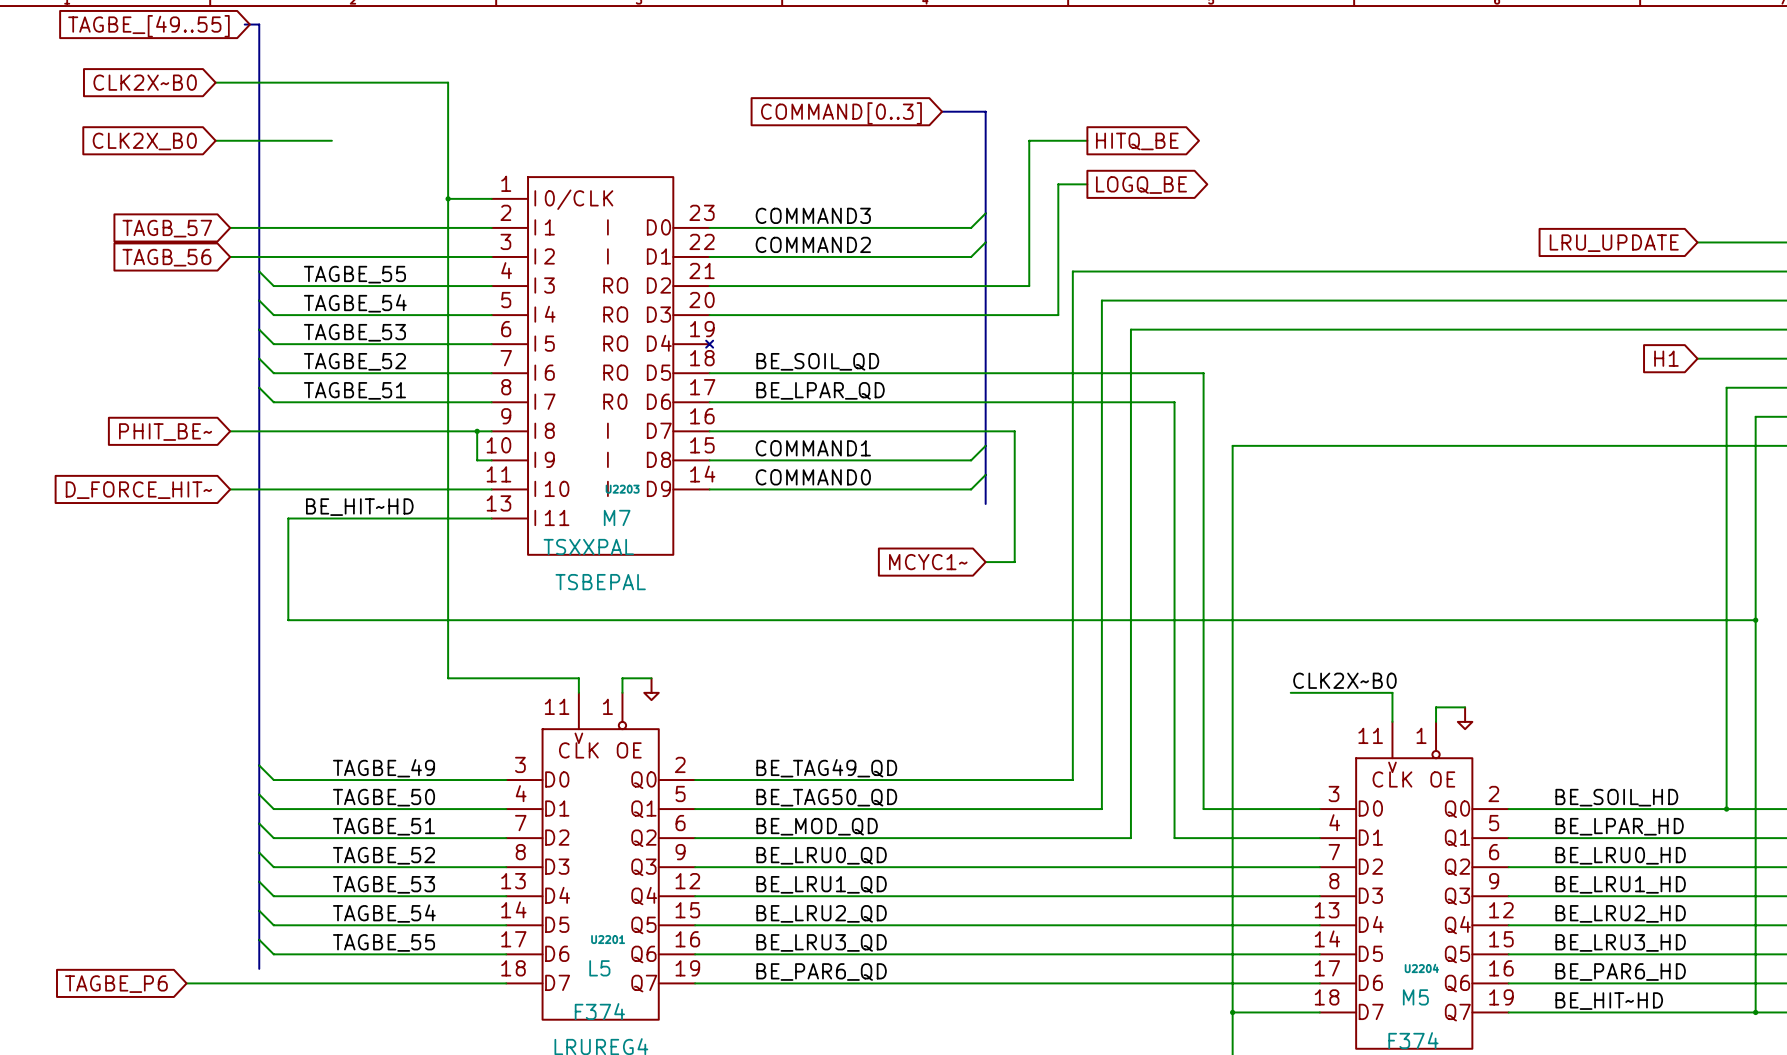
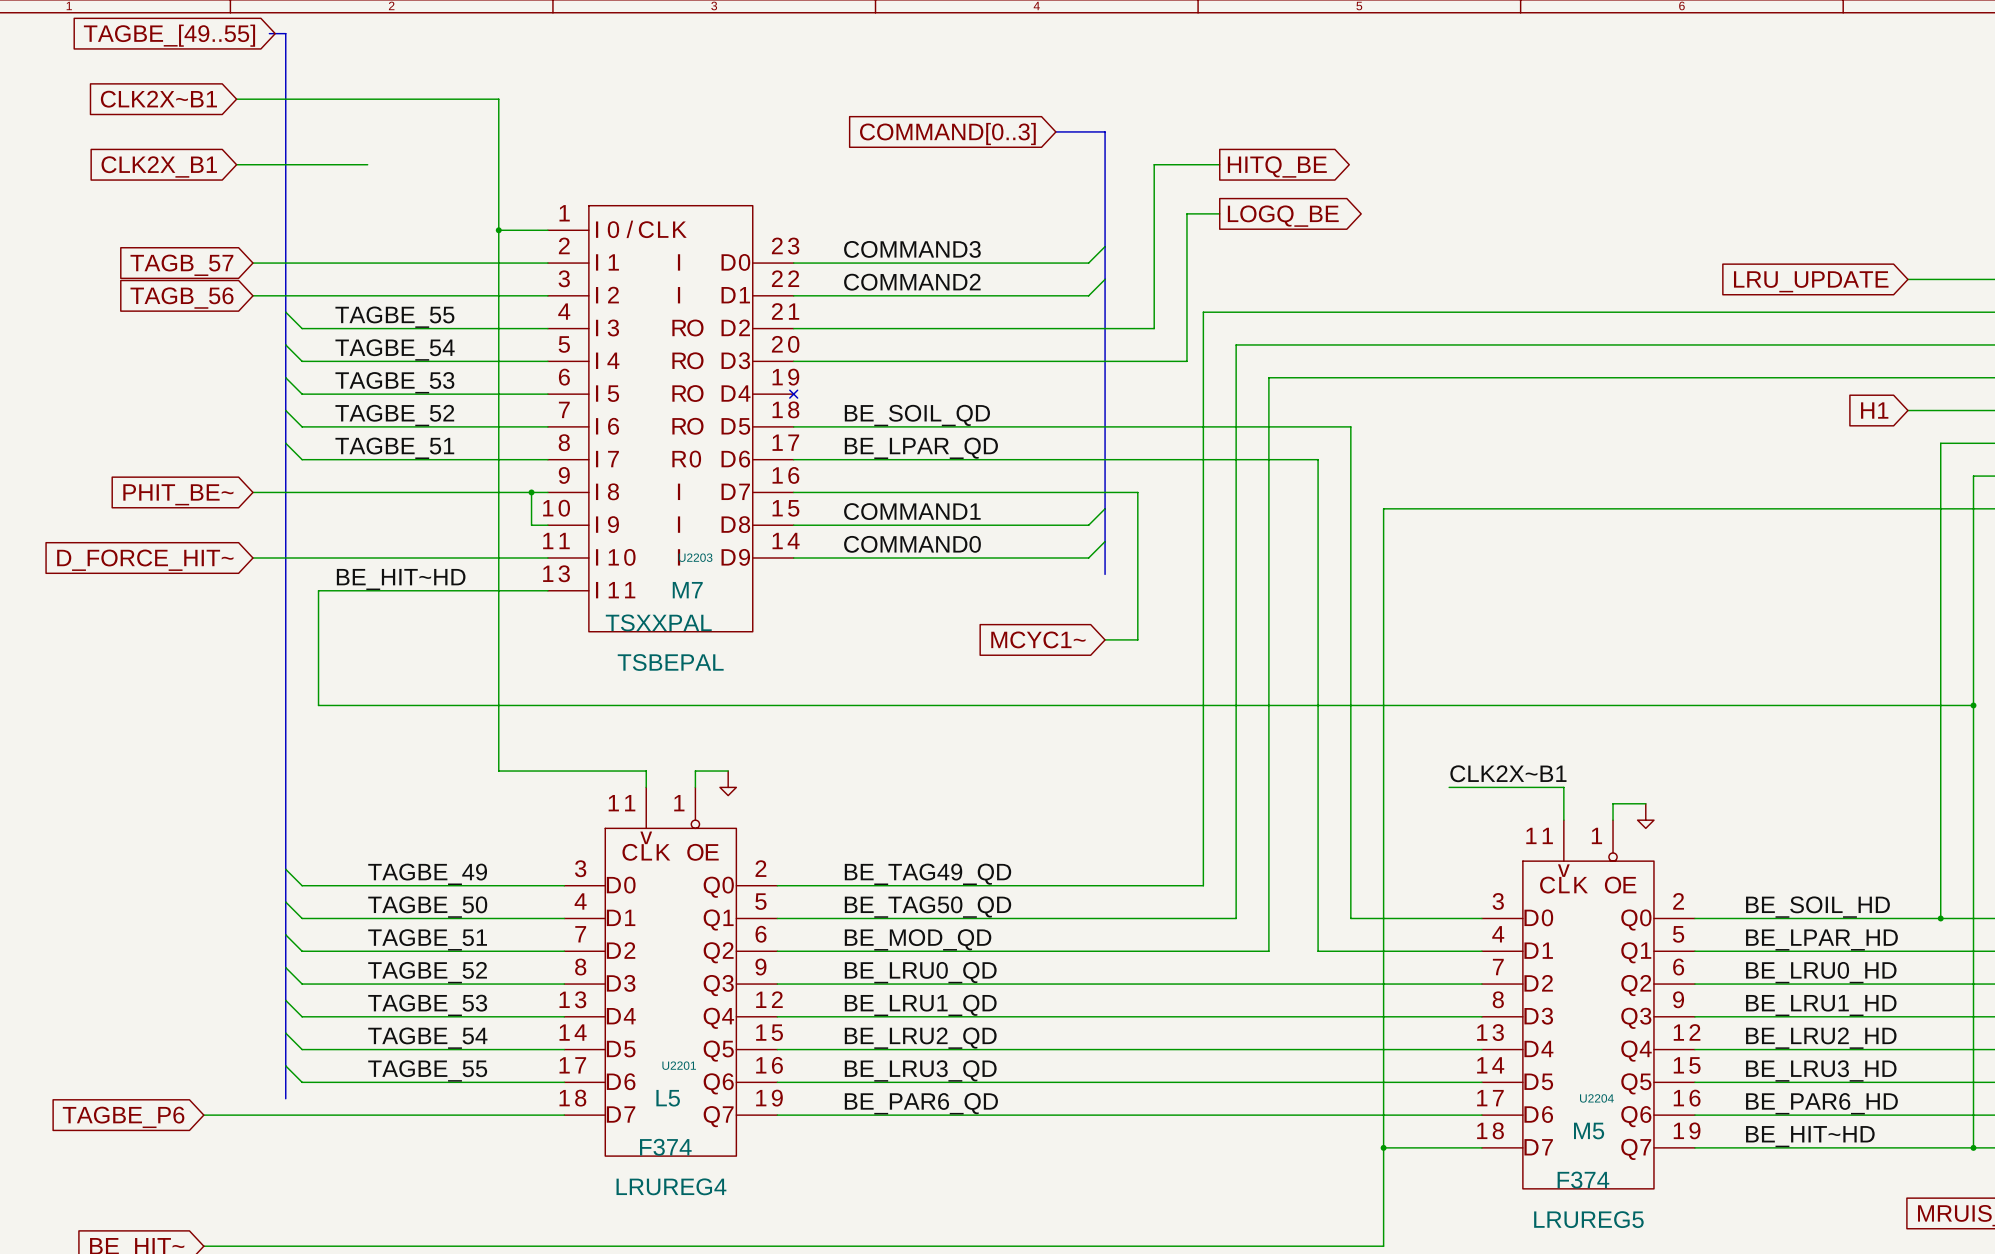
global label: CLK2X~B0 (145, 82) -> CLK2X~B1 (158, 99)
global label: CLK2X_B0 (144, 141) -> CLK2X_B1 (159, 166)
label: CLK2X~B0 (1344, 680) -> CLK2X~B1 (1508, 773)

